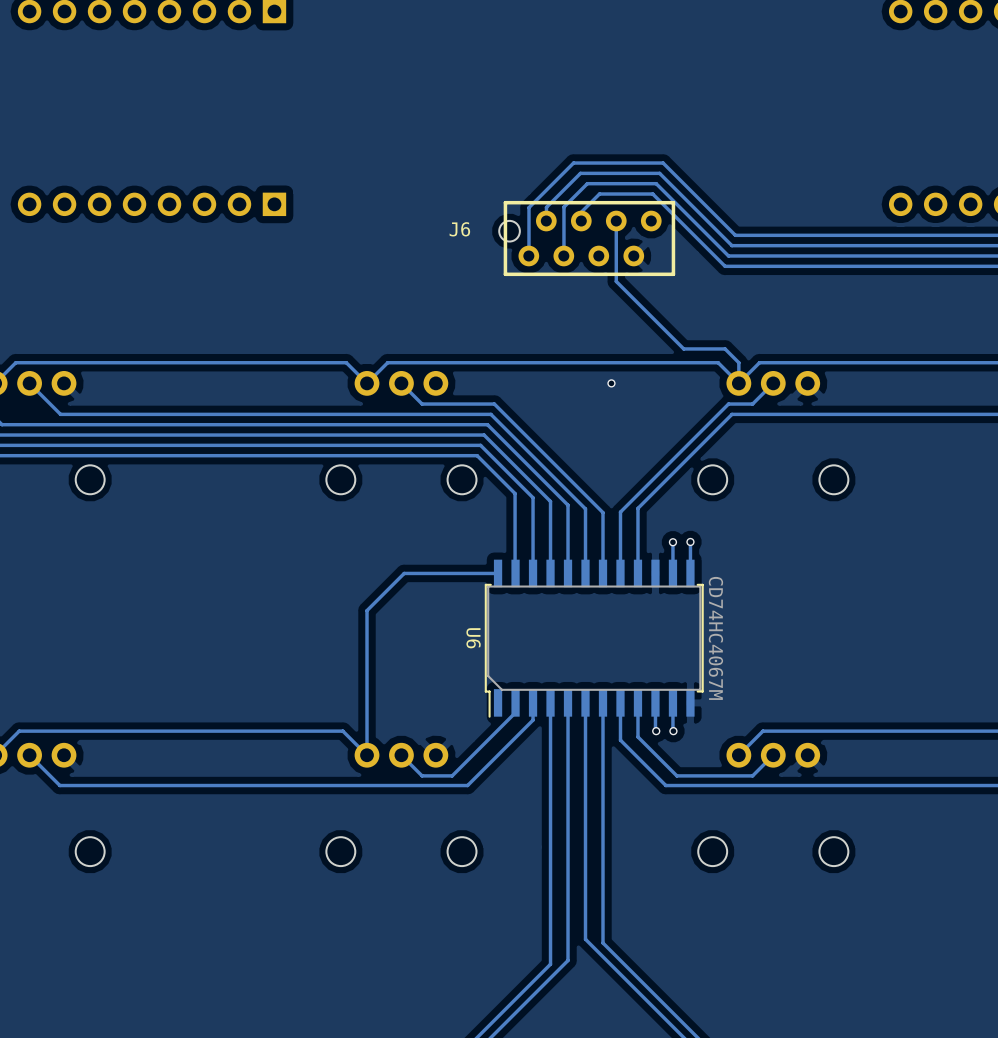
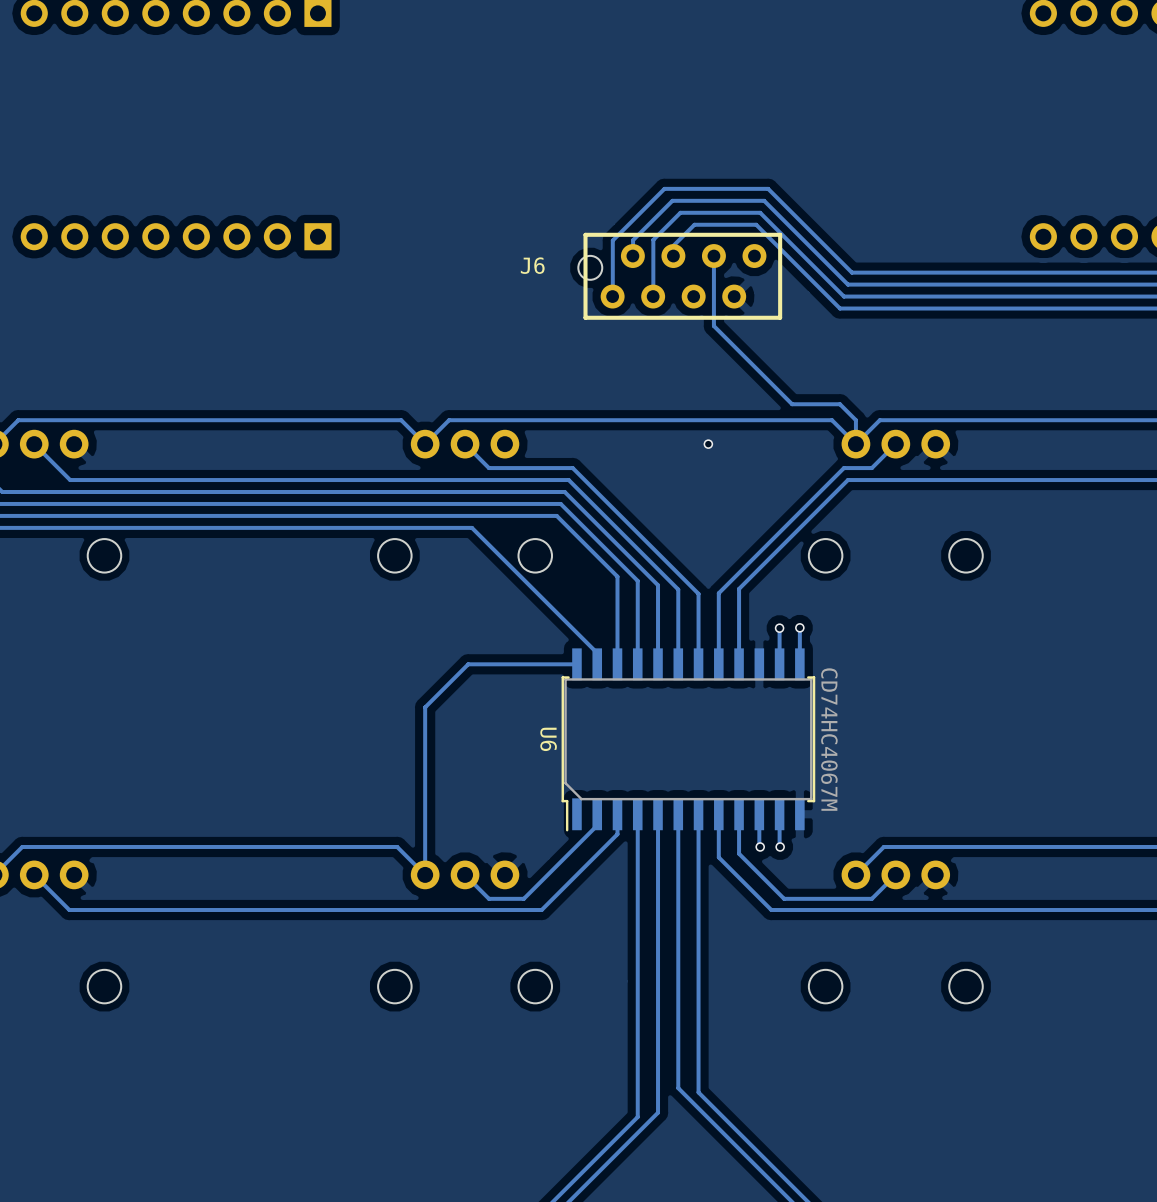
track: (407, 455) (477, 455) (515, 493) (515, 573) -> (471, 527) (597, 653) (597, 664)

